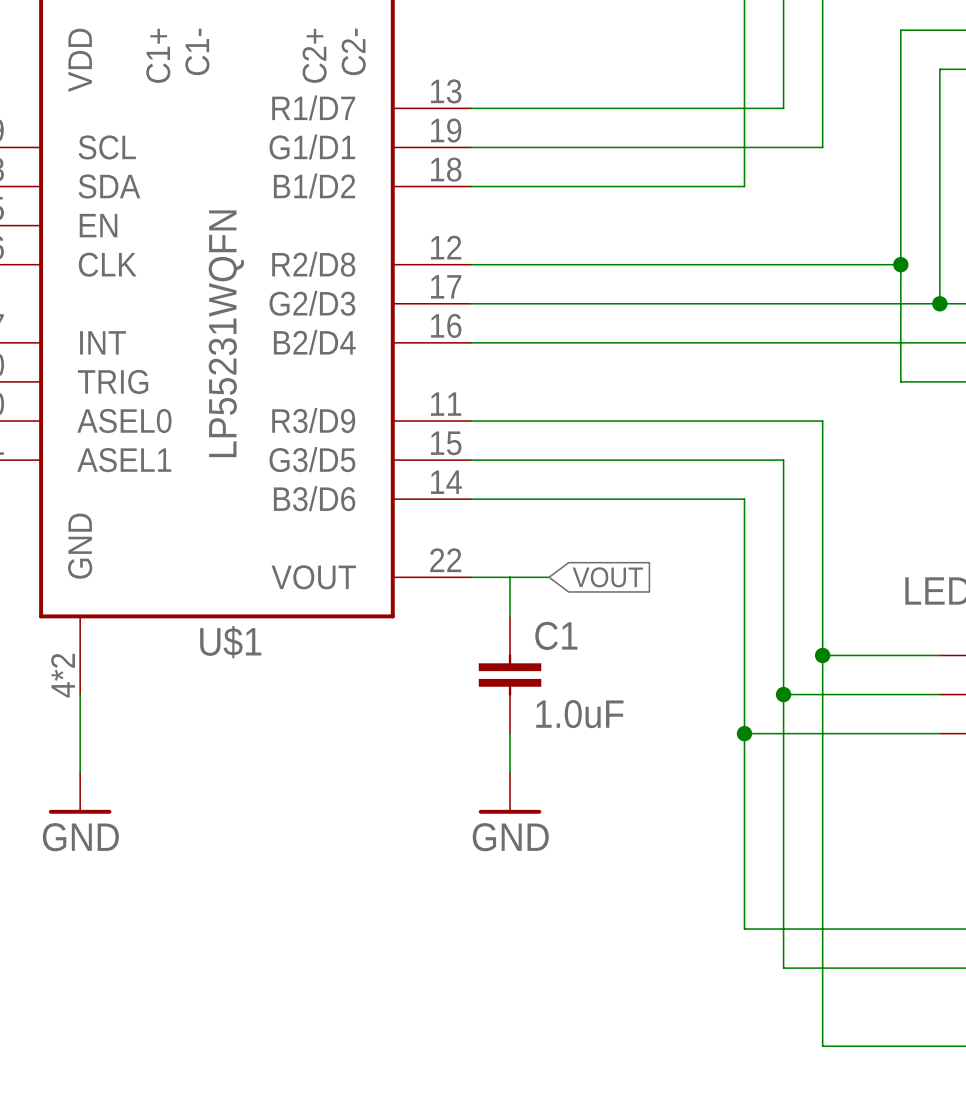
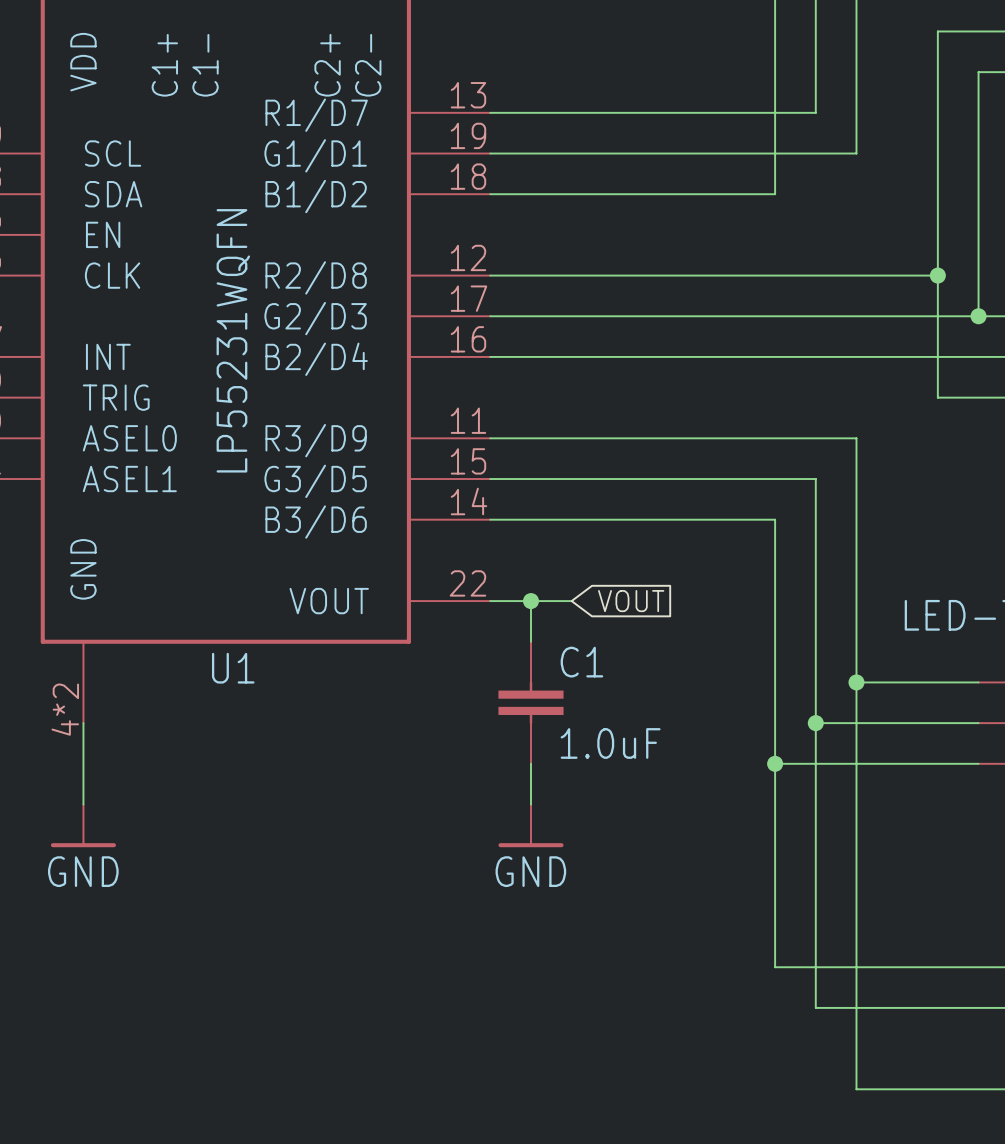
junction: none -> (531, 601)
U$1 name: U$1 (230, 642) -> U1 (233, 668)

